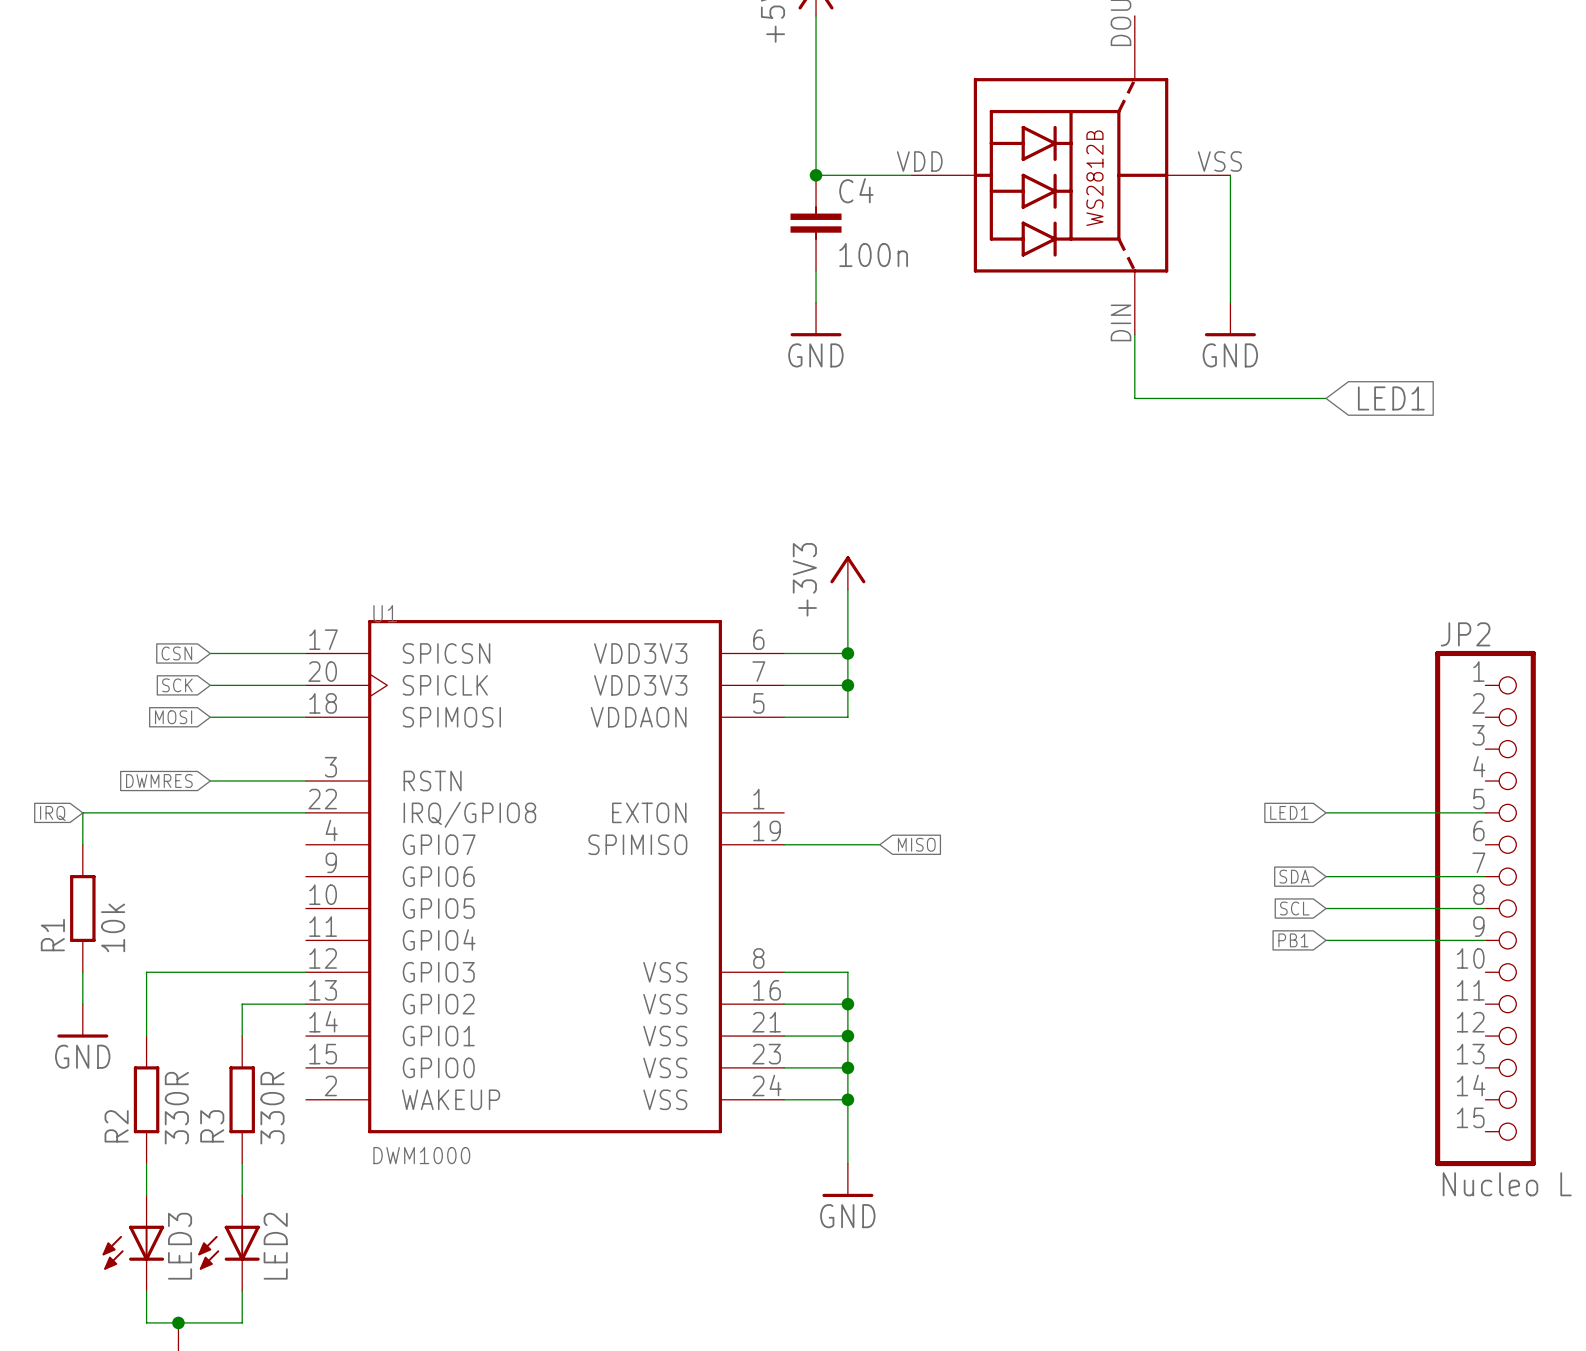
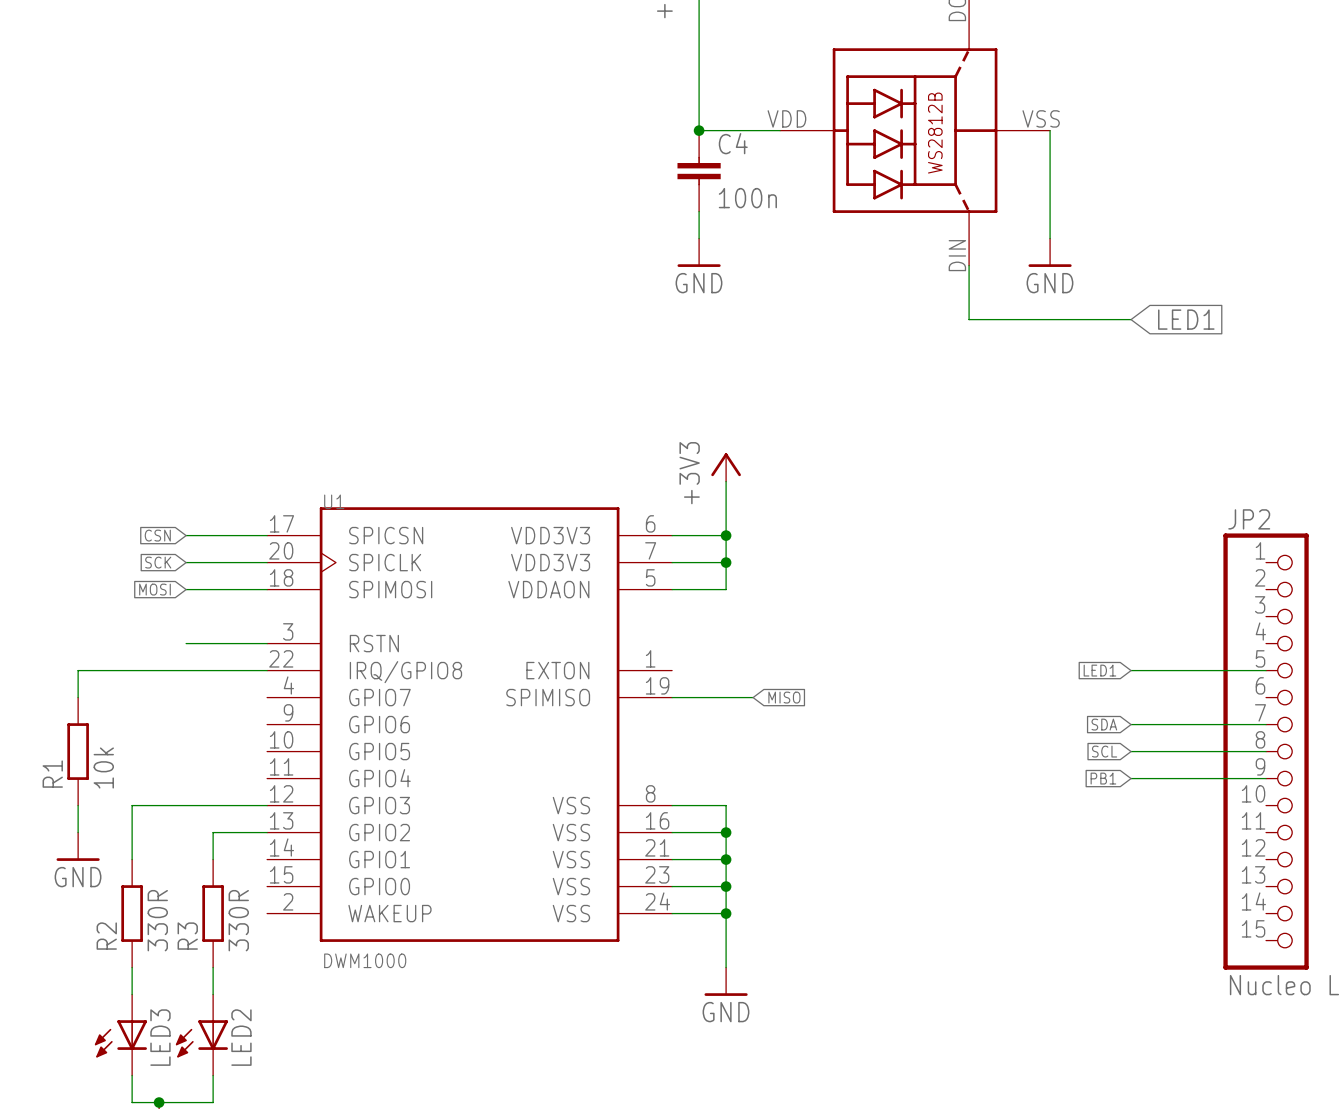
global label: DWMRES (159, 781) -> none
global label: IRQ (52, 813) -> none

